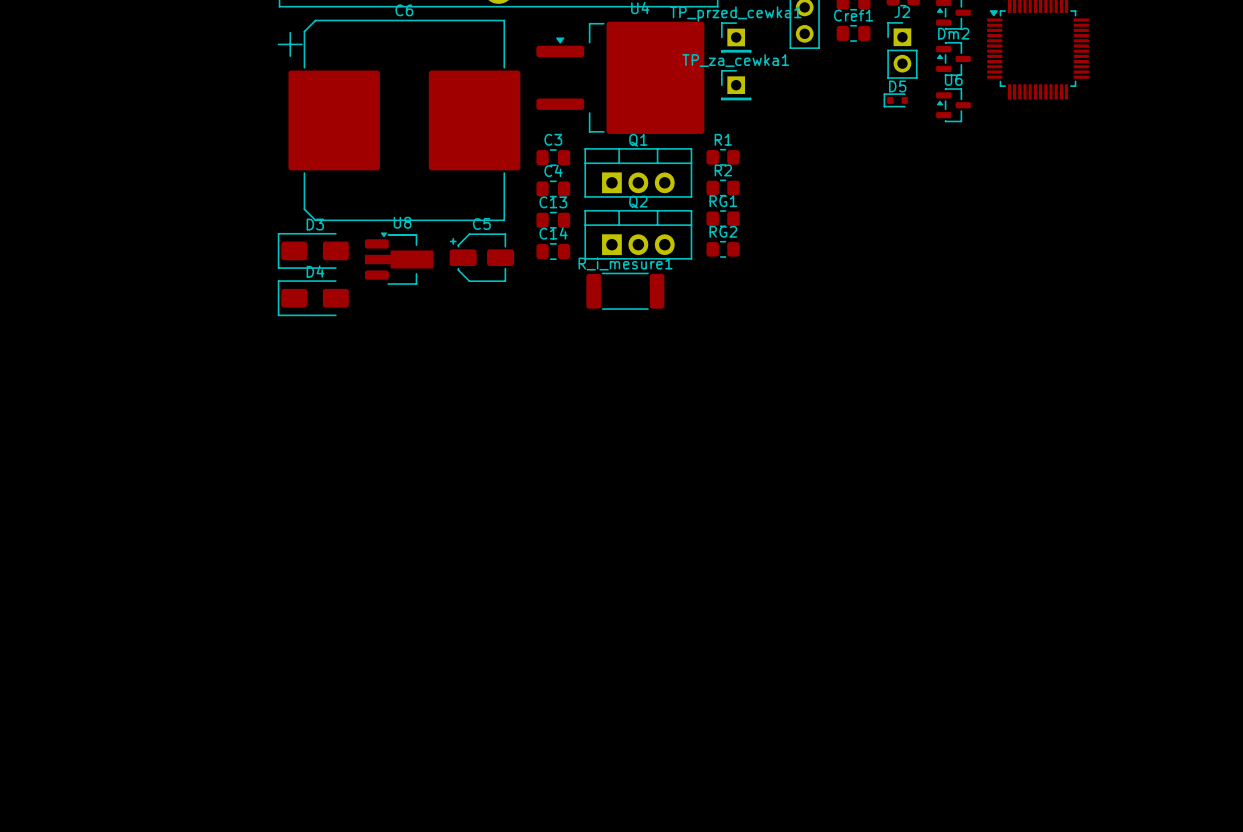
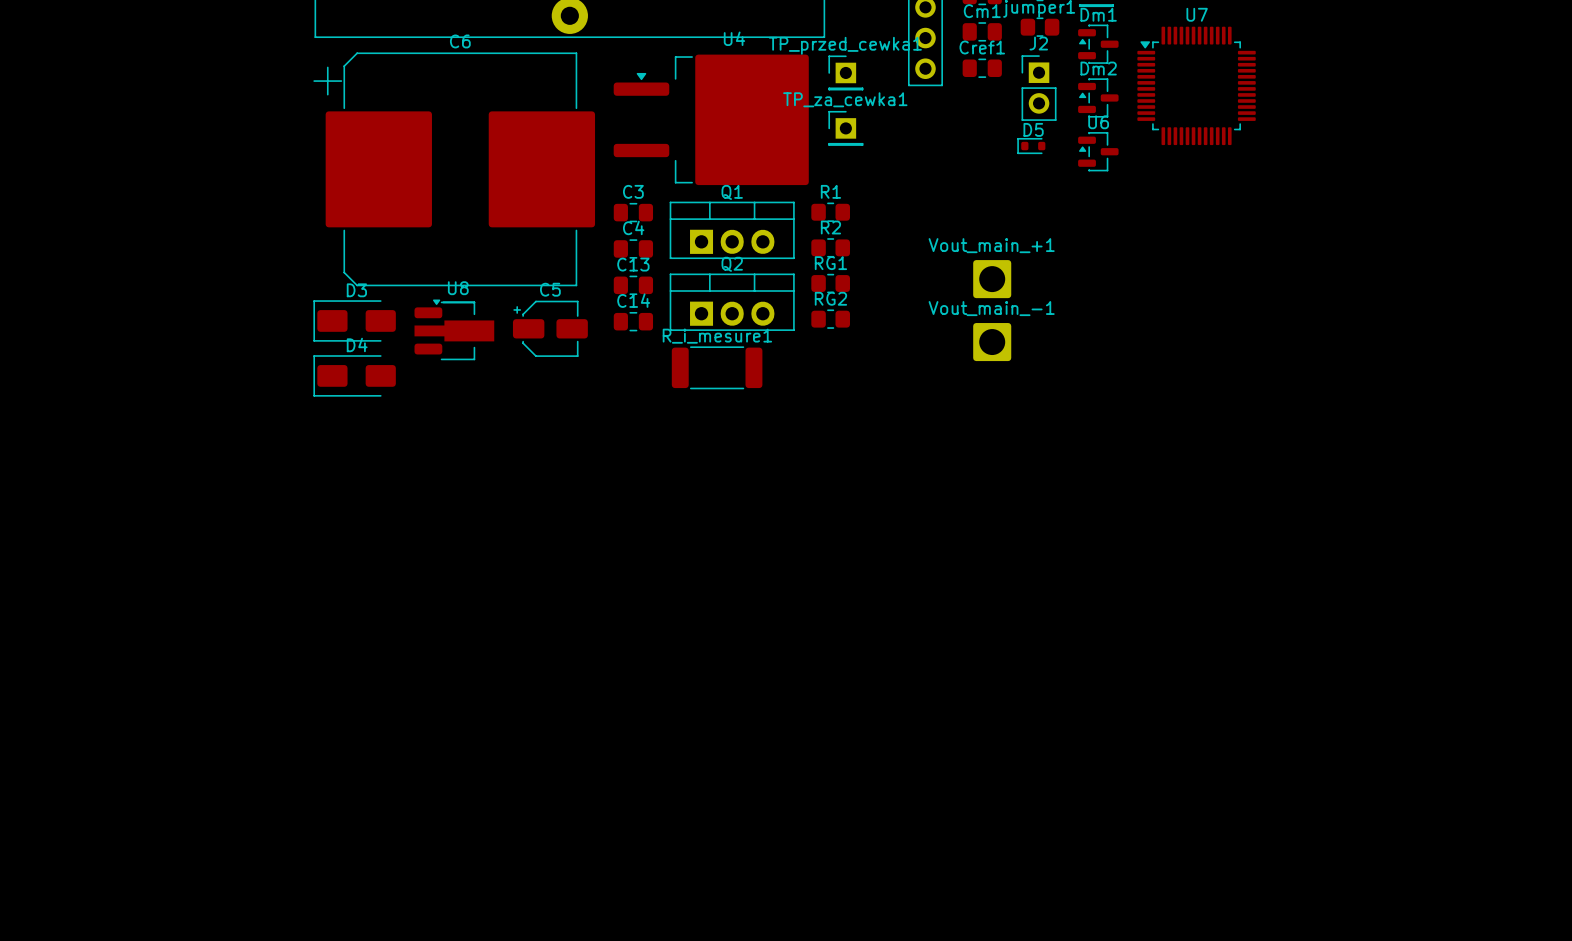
Vout_main_+1: none -> (992, 279)
Vout_main_-1: none -> (992, 342)

